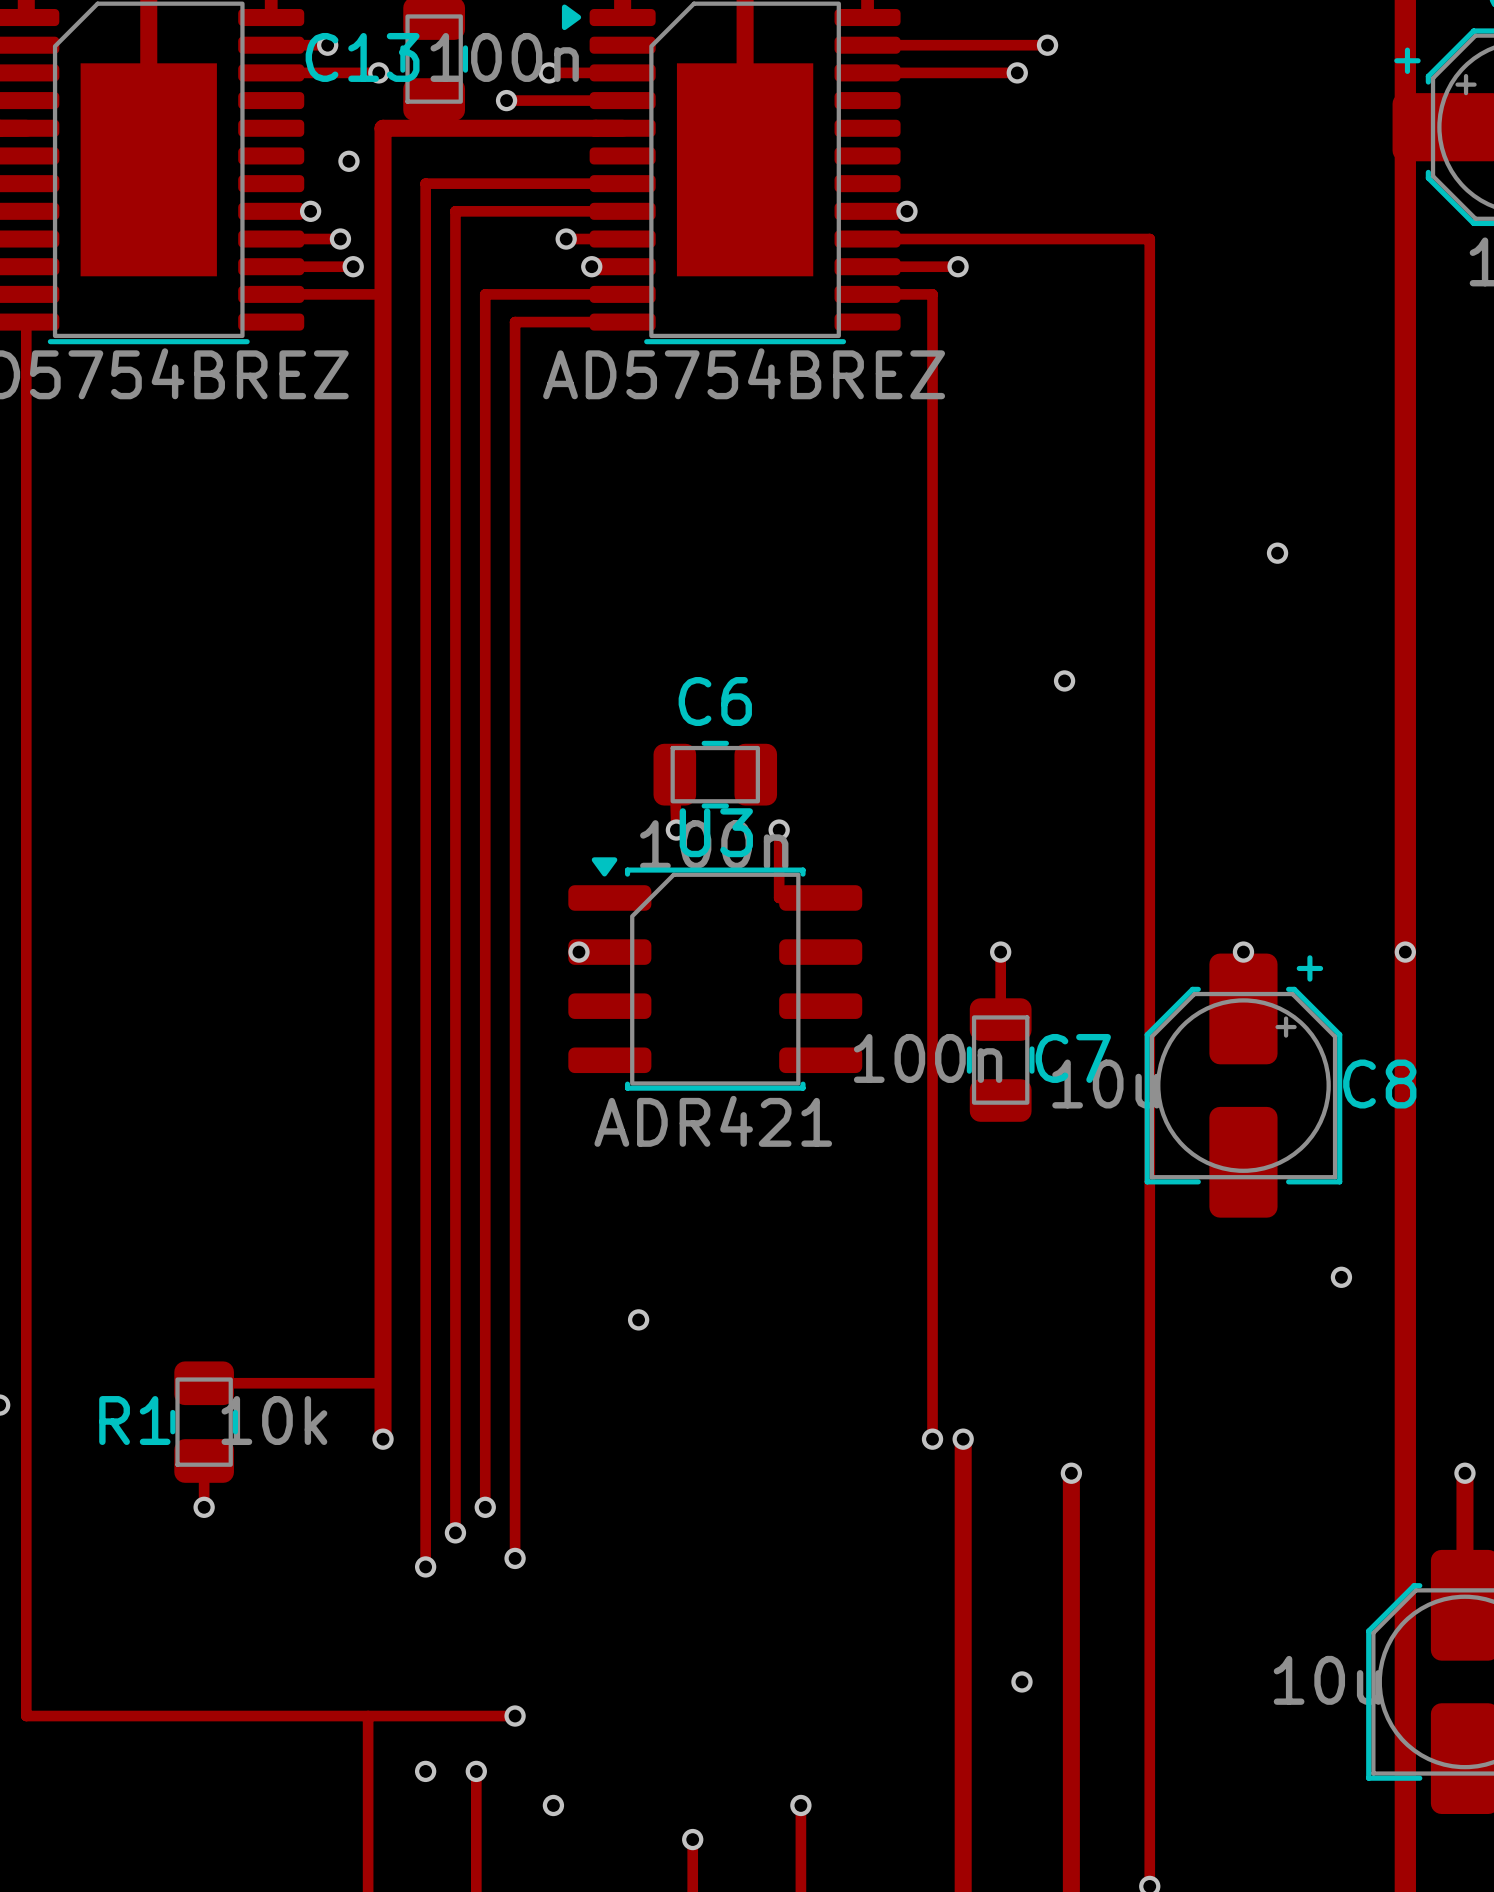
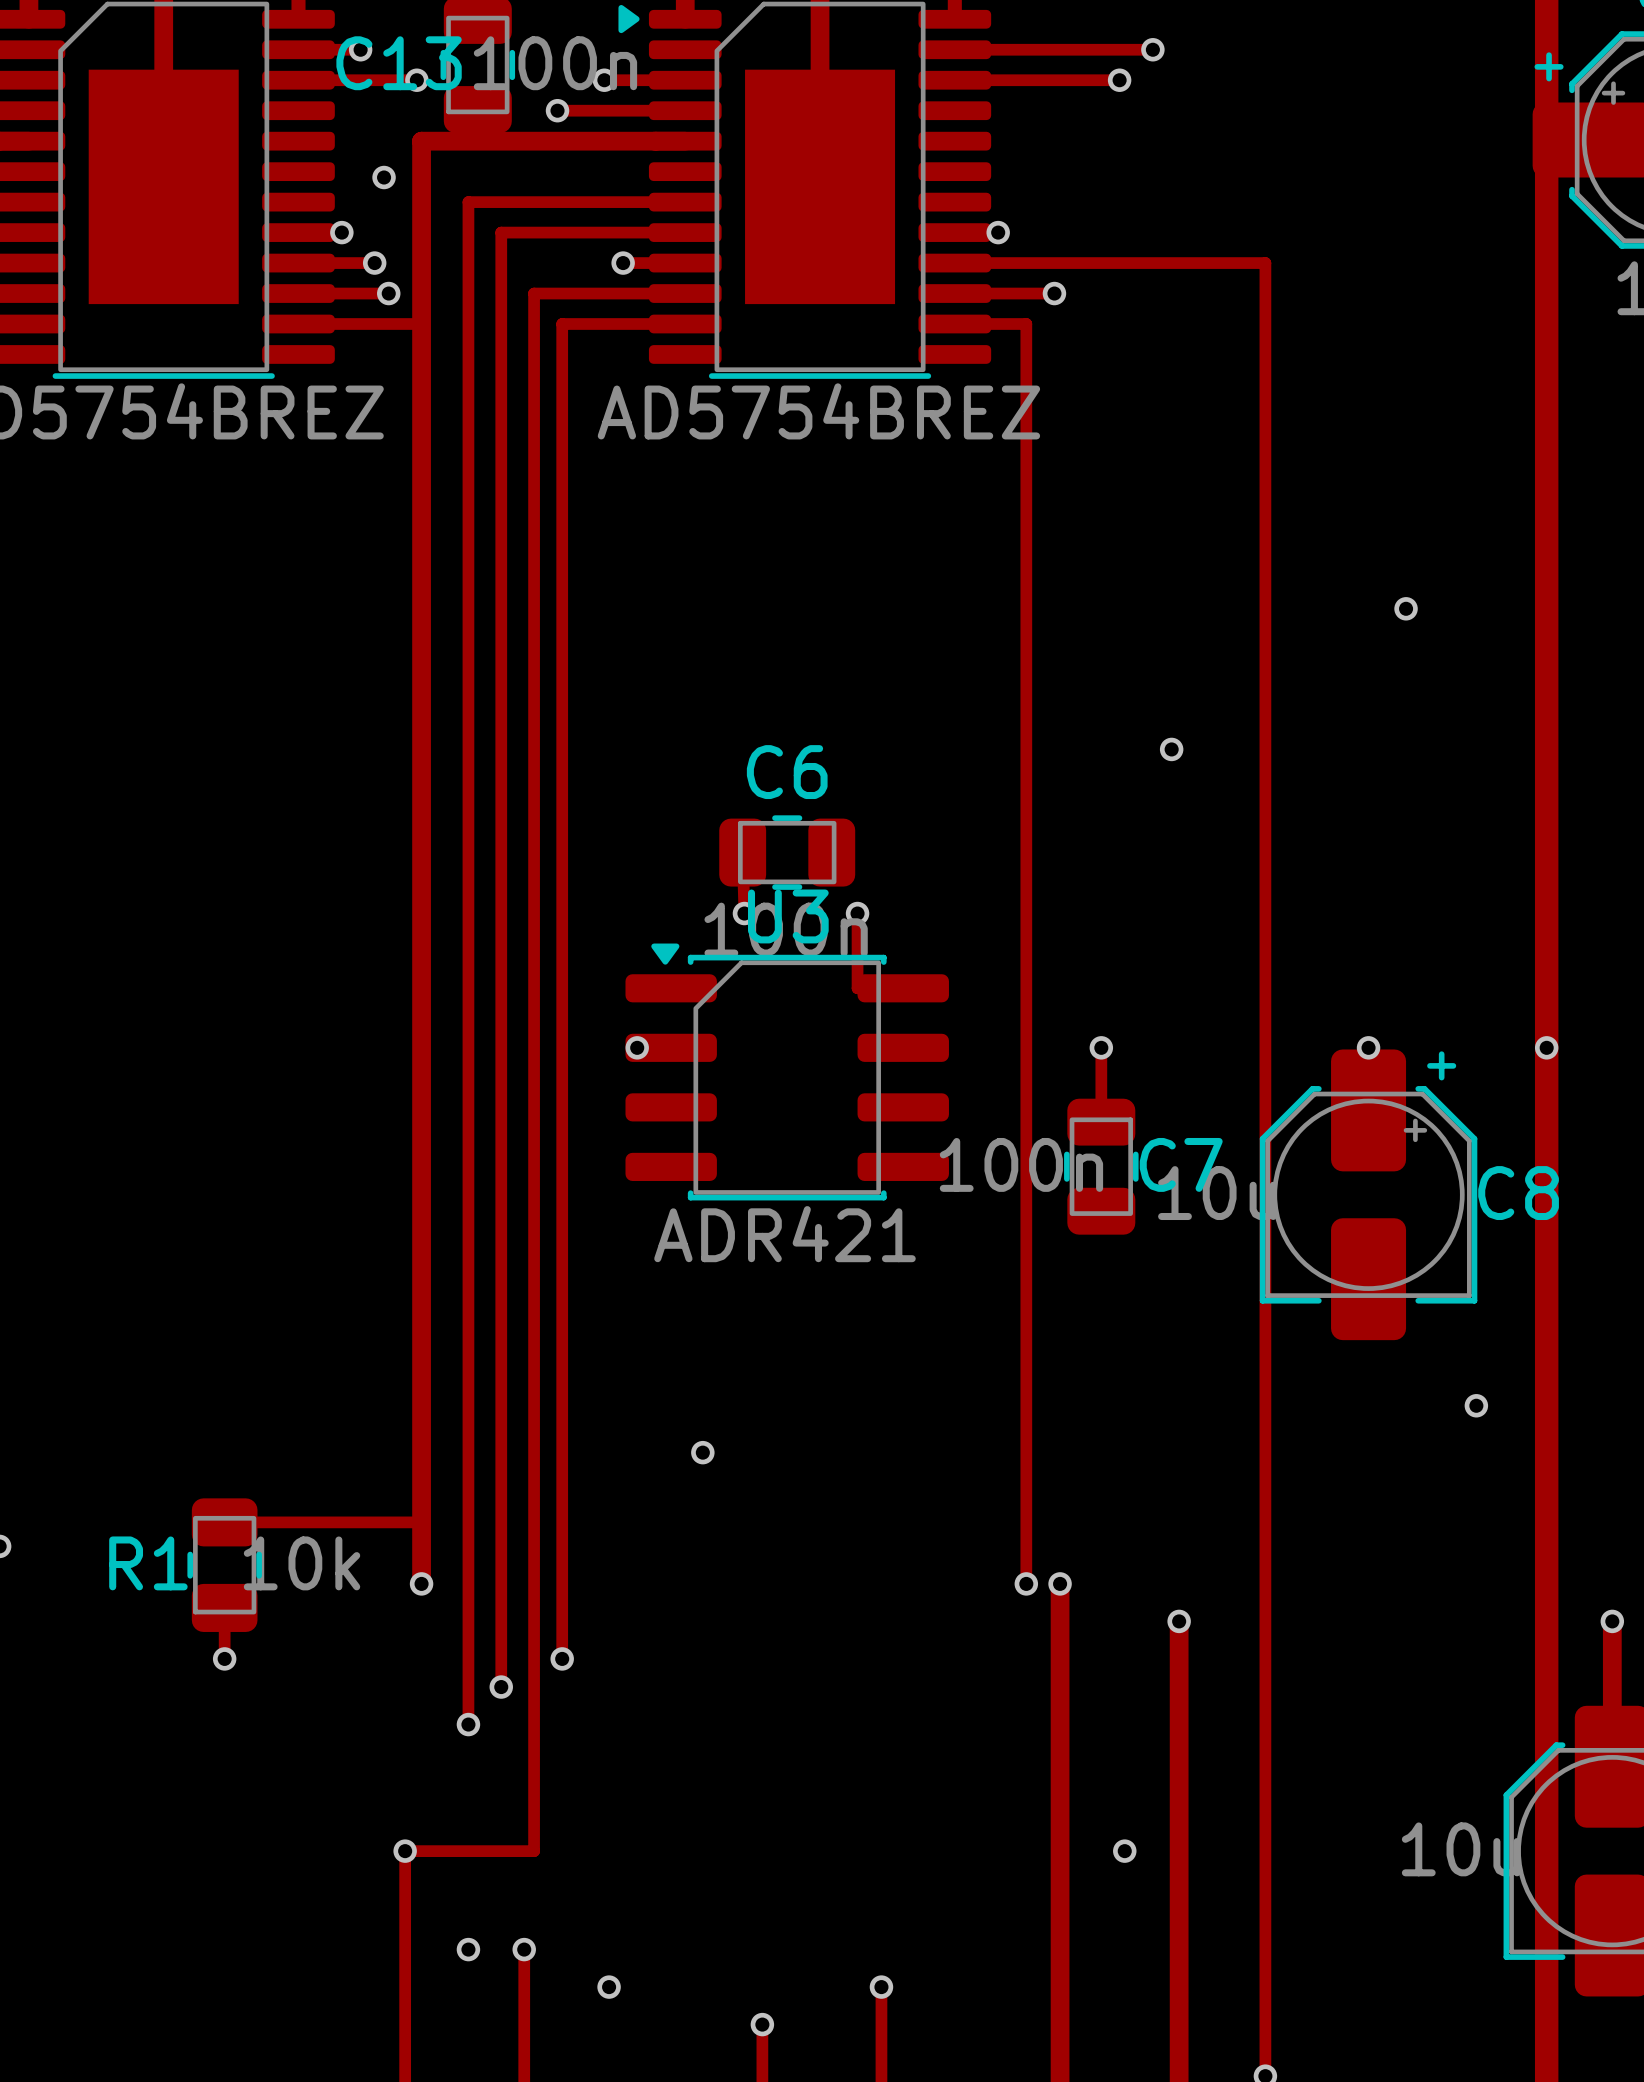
via: (591, 266) -> none
track: (485, 294) (510, 294) -> (534, 324) (534, 293) (651, 293)
track: none -> (562, 324) (562, 1658)
track: (26, 322) (26, 1716) (515, 1716) -> none
track: (622, 322) (515, 322) (515, 1558) -> none
track: none -> (534, 1658) (534, 1851) (405, 1851) (405, 1888)
via: (485, 1507) -> none
via: none -> (562, 1658)
via: (515, 1558) -> none
via: none -> (405, 1851)
via: (515, 1716) -> none

